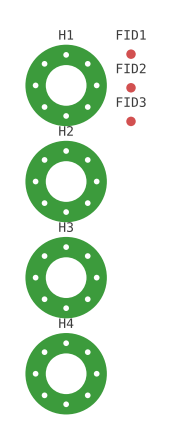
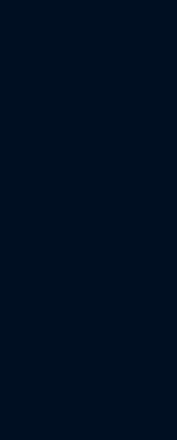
FID1: (131, 54) -> none
H1: (66, 85) -> none
FID2: (131, 87) -> none
FID3: (131, 121) -> none
H2: (66, 181) -> none
H3: (66, 277) -> none
H4: (66, 373) -> none

